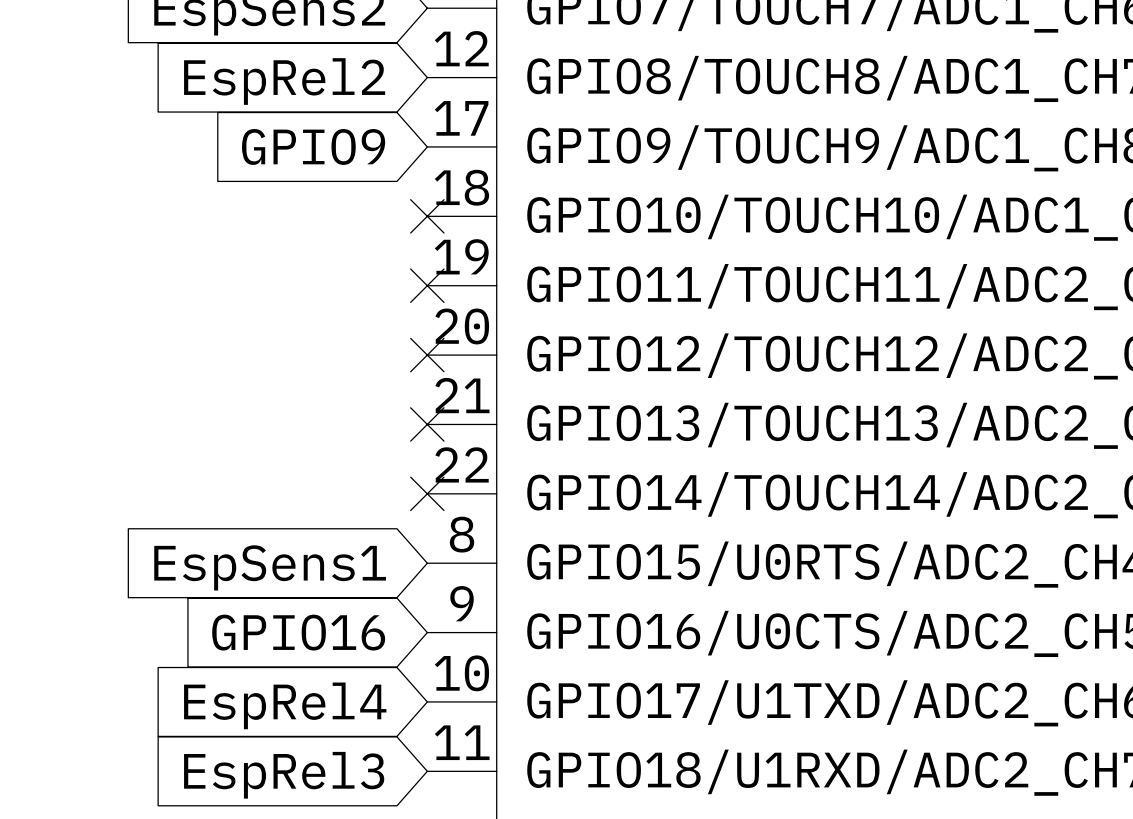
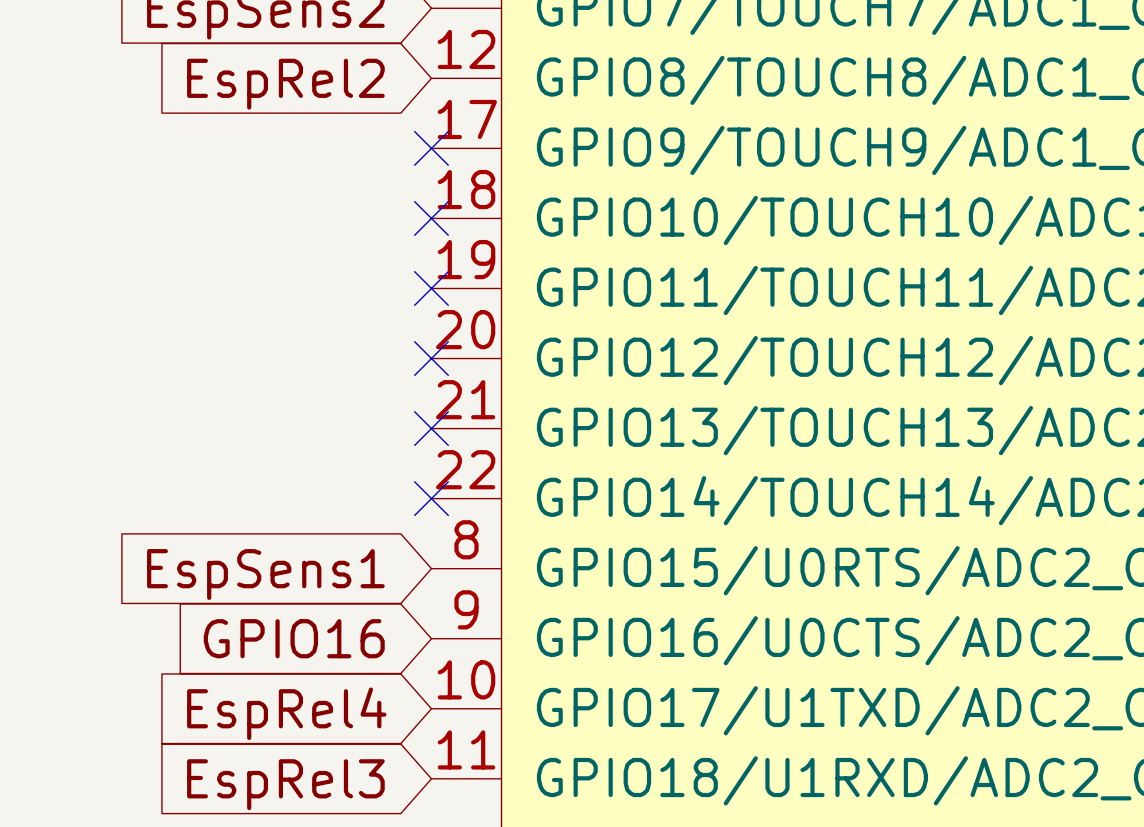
global label: GPIO9 (313, 146) -> none
no-connect mark: none -> (431, 148)

